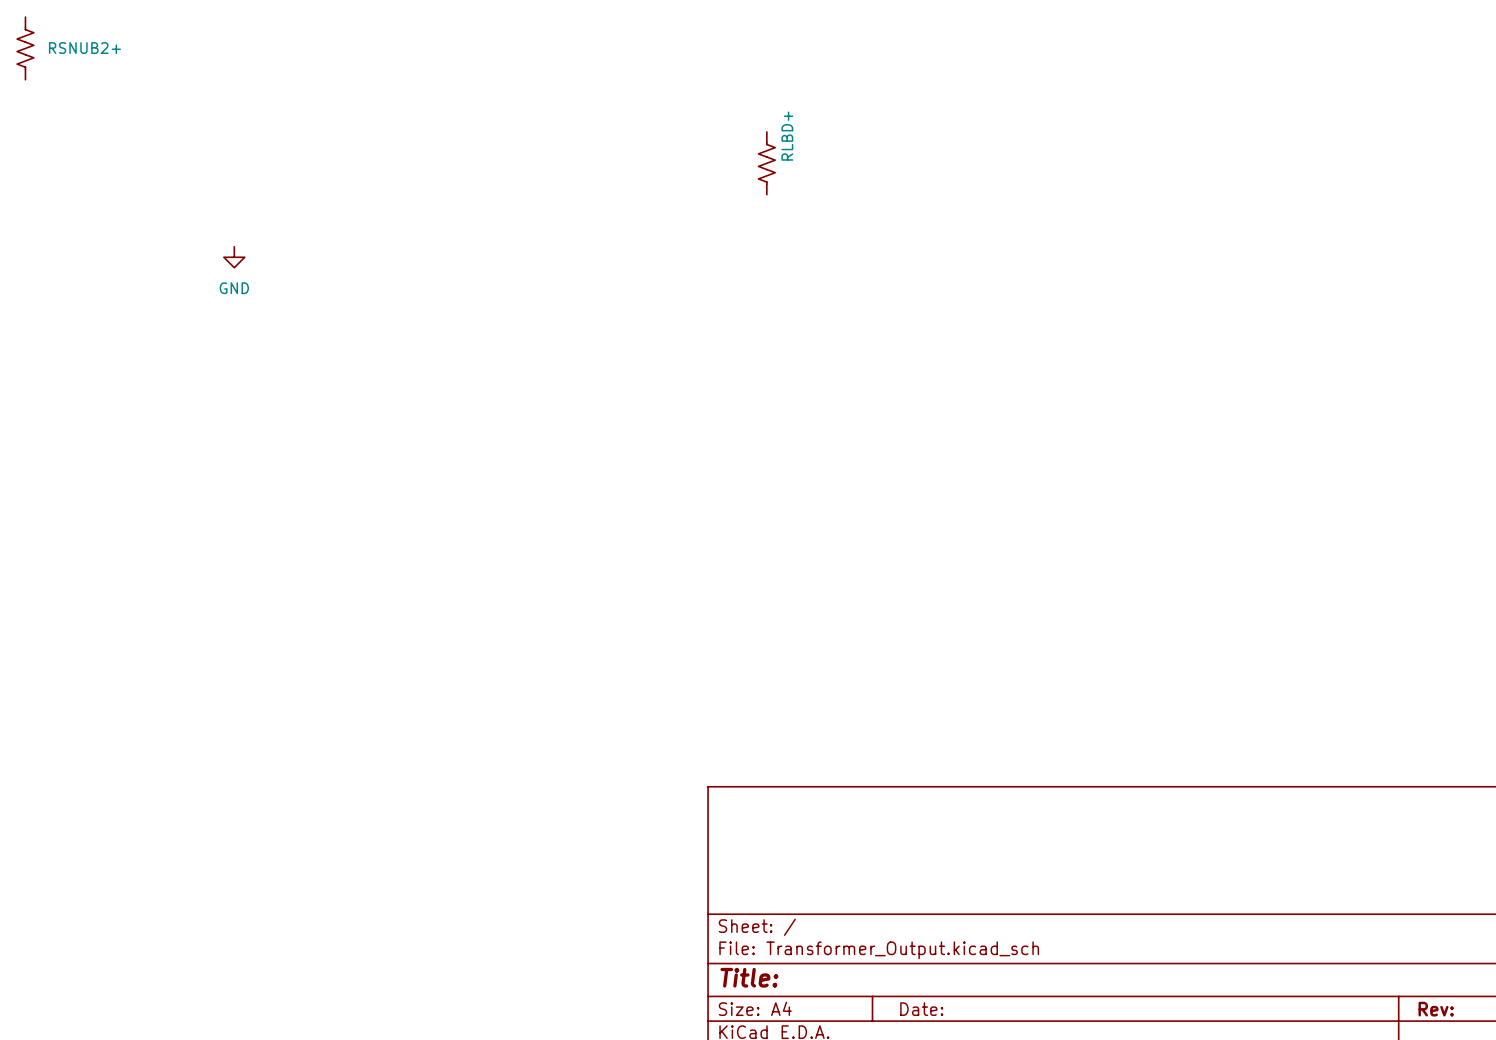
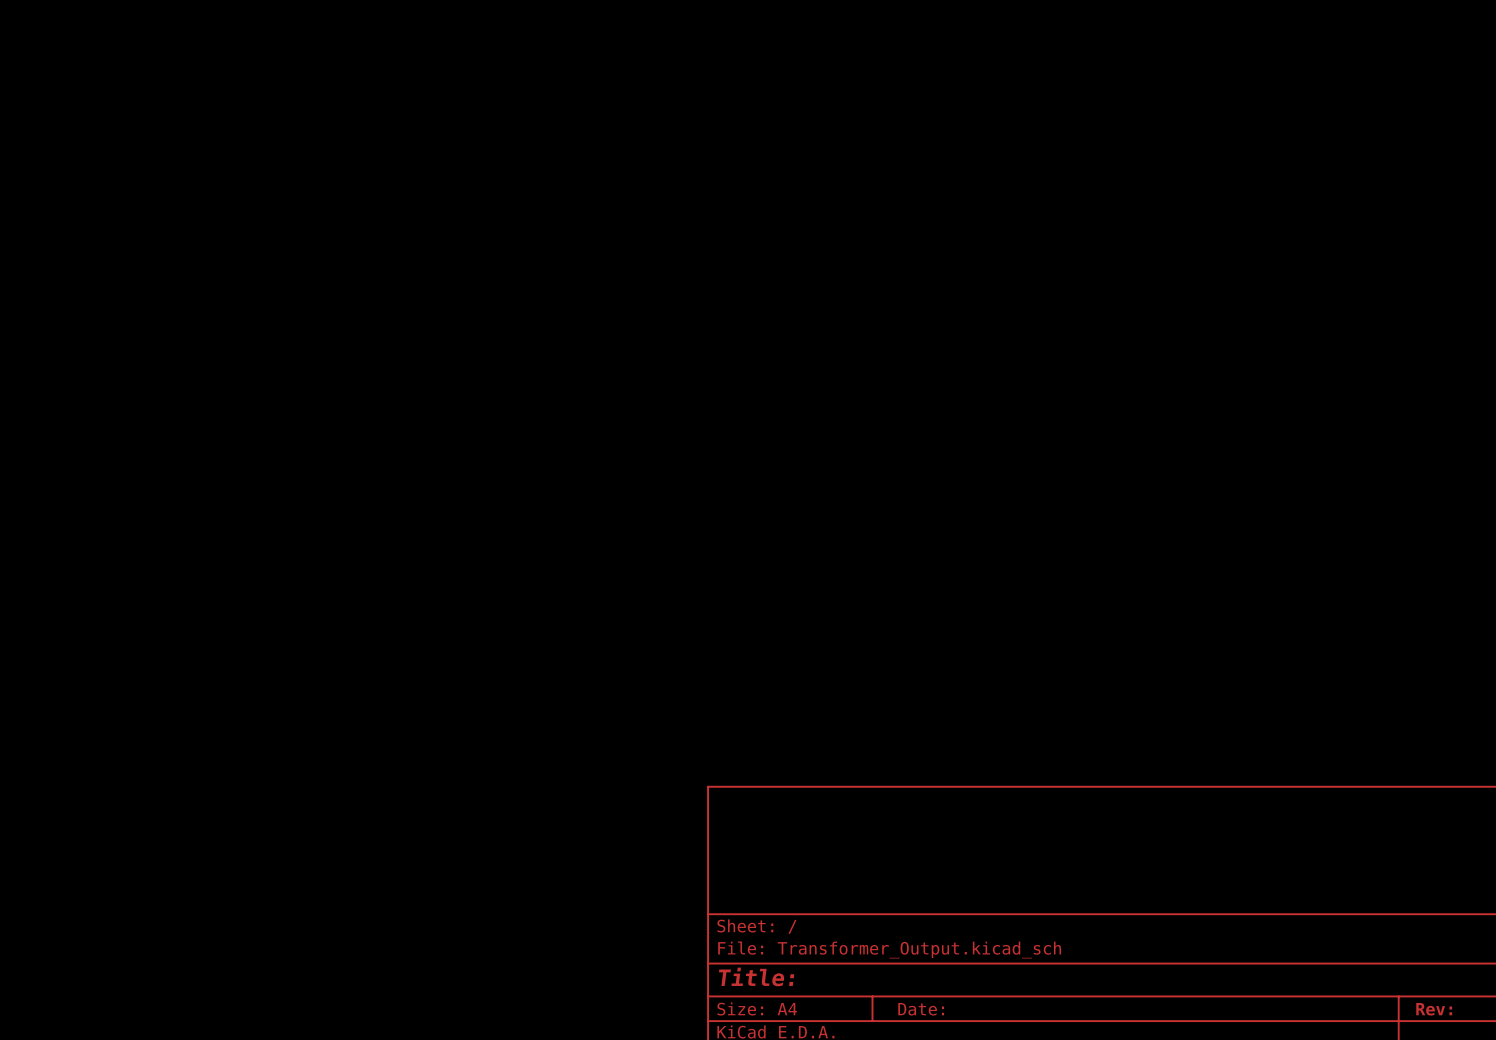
part: RSNUB2+ (25, 48) -> none
part: RLBD+ (766, 163) -> none
power symbol: GND (234, 257) -> none

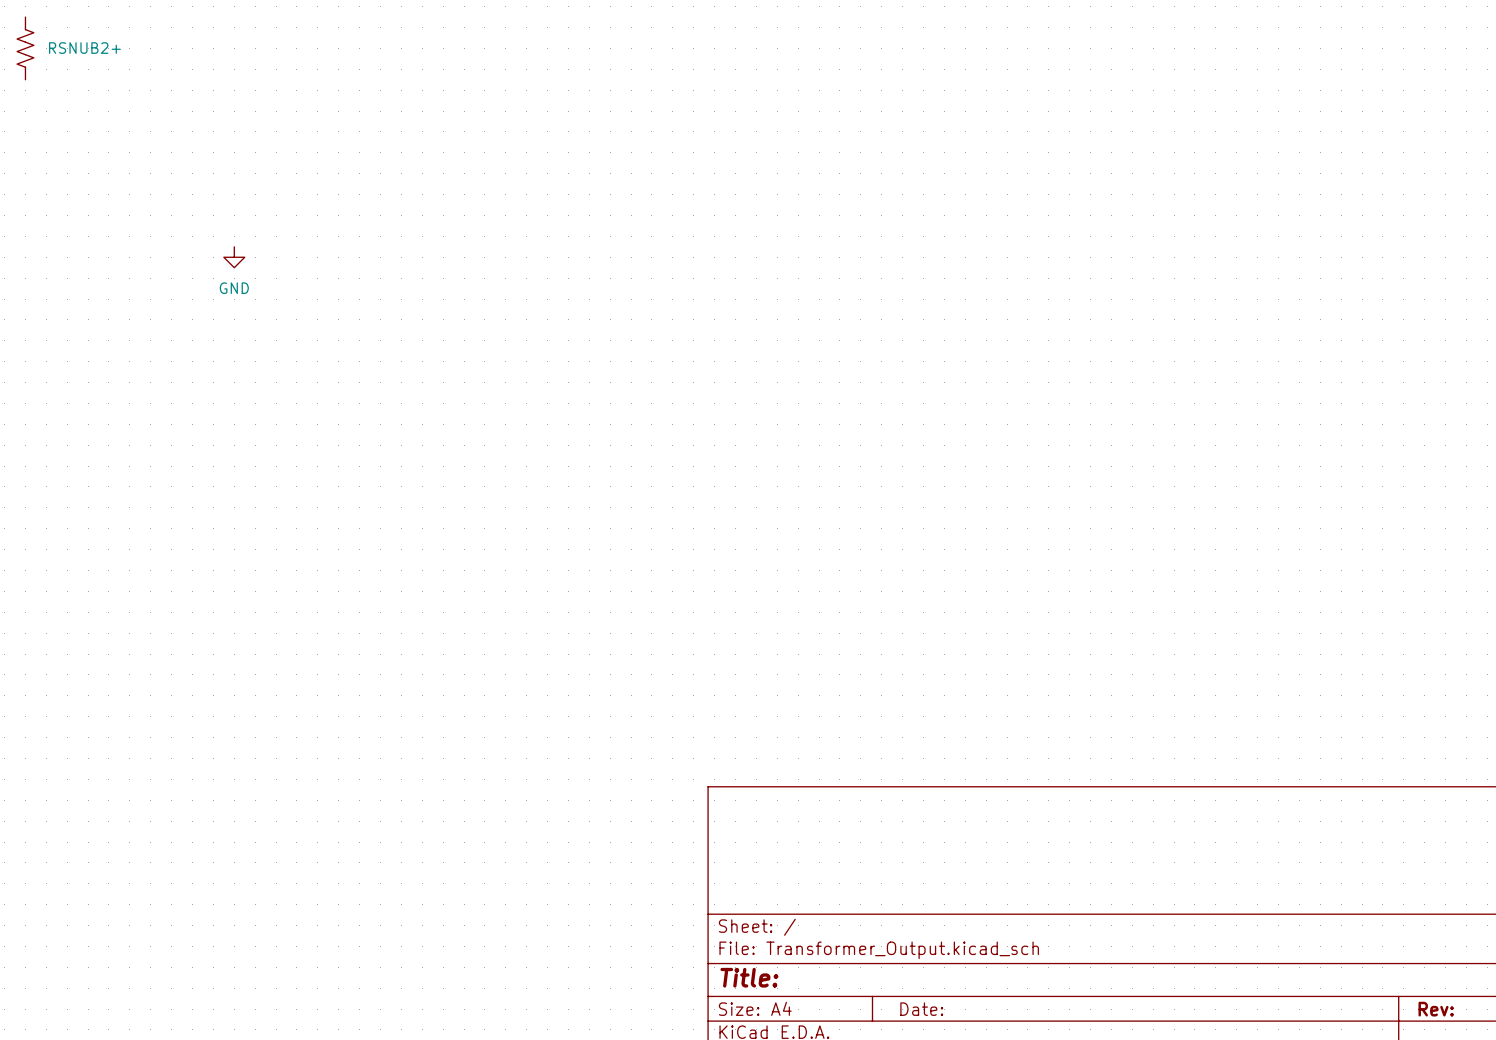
part: none -> RSNUB2+ (25, 48)
power symbol: none -> GND (234, 257)

